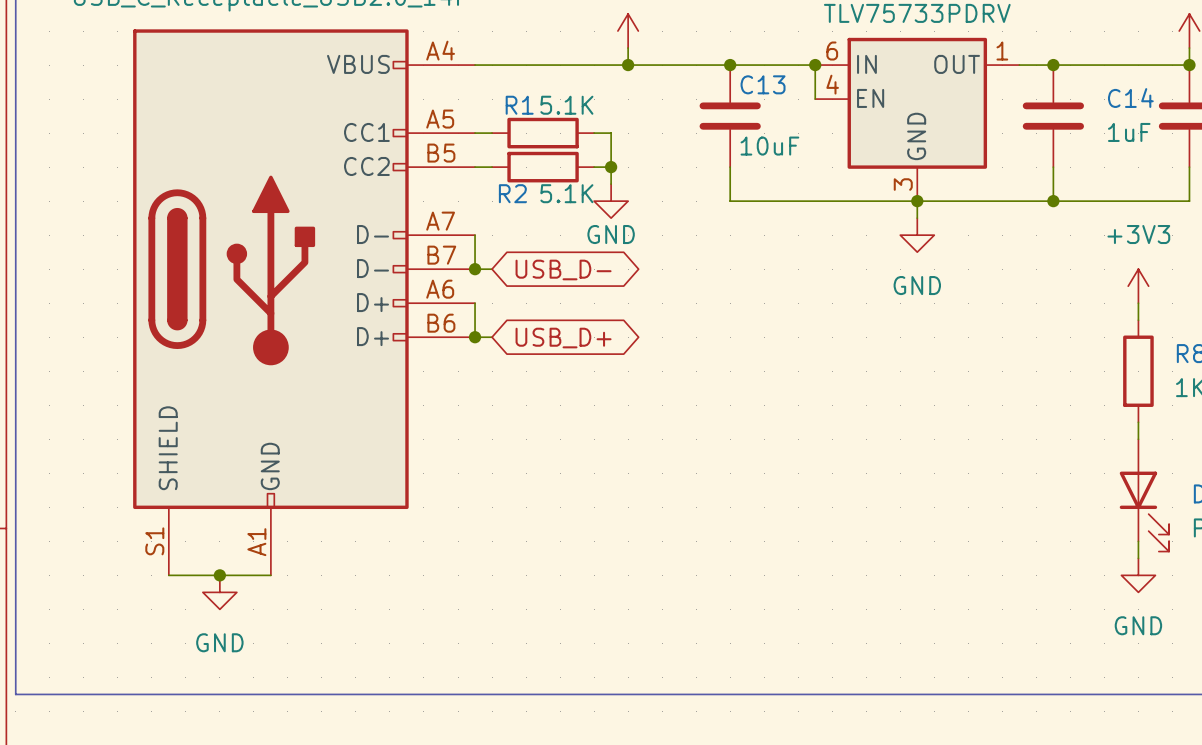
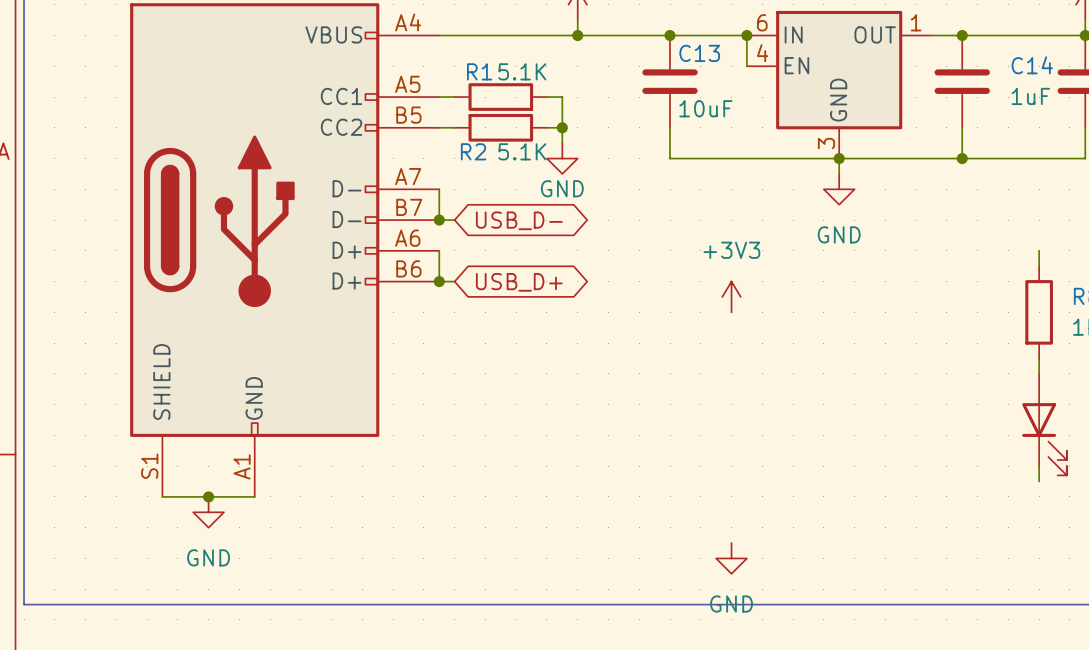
power symbol: +3V3 (1138, 286) -> none
power symbol: none -> +3V3 (731, 296)
power symbol: GND (1138, 575) -> none
power symbol: none -> GND (731, 558)

